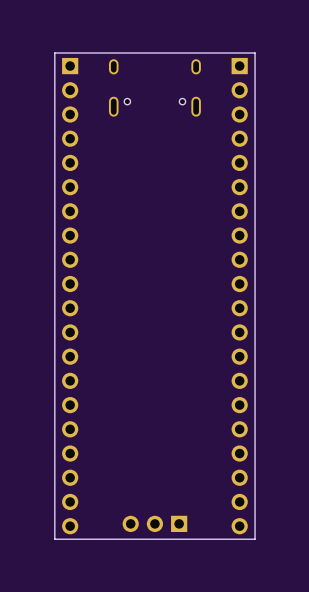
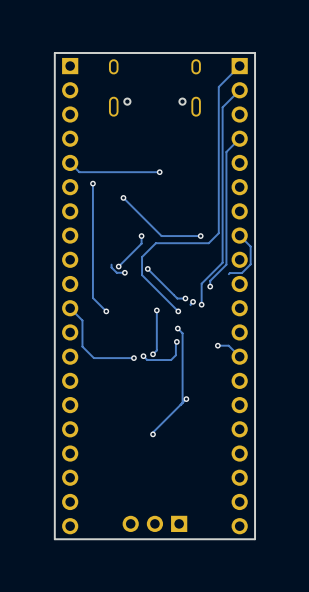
track: none -> (239, 66) (218, 86) (218, 233) (208, 243) (155, 243) (142, 257) (142, 275) (178, 311)
track: none -> (239, 90) (222, 107) (222, 262) (201, 283) (201, 304)
track: none -> (239, 138) (226, 151) (226, 264) (210, 280) (210, 286)
track: none -> (70, 162) (79, 172) (159, 172)
via: none -> (159, 172)
track: none -> (92, 183) (92, 298) (106, 311)
via: none -> (92, 183)
track: none -> (123, 197) (161, 236) (200, 236)
via: none -> (123, 197)
track: none -> (239, 235) (250, 246) (250, 264) (241, 273) (228, 274)
track: none -> (141, 236) (141, 243) (118, 266)
via: none -> (141, 236)
via: none -> (200, 236)
track: none -> (111, 264) (111, 267) (116, 272) (124, 272)
via: none -> (118, 266)
track: none -> (147, 268) (177, 298) (185, 298)
via: none -> (147, 268)
via: none -> (124, 272)
via: none -> (210, 286)
via: none -> (185, 298)
track: none -> (193, 301) (190, 305)
via: none -> (193, 301)
via: none -> (201, 304)
track: none -> (70, 308) (82, 320) (82, 346) (93, 358) (133, 358)
track: none -> (156, 310) (156, 350) (153, 354)
via: none -> (156, 310)
via: none -> (106, 311)
via: none -> (178, 311)
track: none -> (177, 328) (182, 333) (182, 402)
via: none -> (177, 328)
track: none -> (176, 341) (175, 355) (171, 360) (147, 360) (143, 356)
via: none -> (176, 341)
track: none -> (217, 345) (228, 345) (239, 356)
via: none -> (217, 345)
via: none -> (153, 354)
via: none -> (143, 356)
via: none -> (133, 358)
track: none -> (186, 399) (153, 434)
via: none -> (186, 399)
via: none -> (153, 434)

